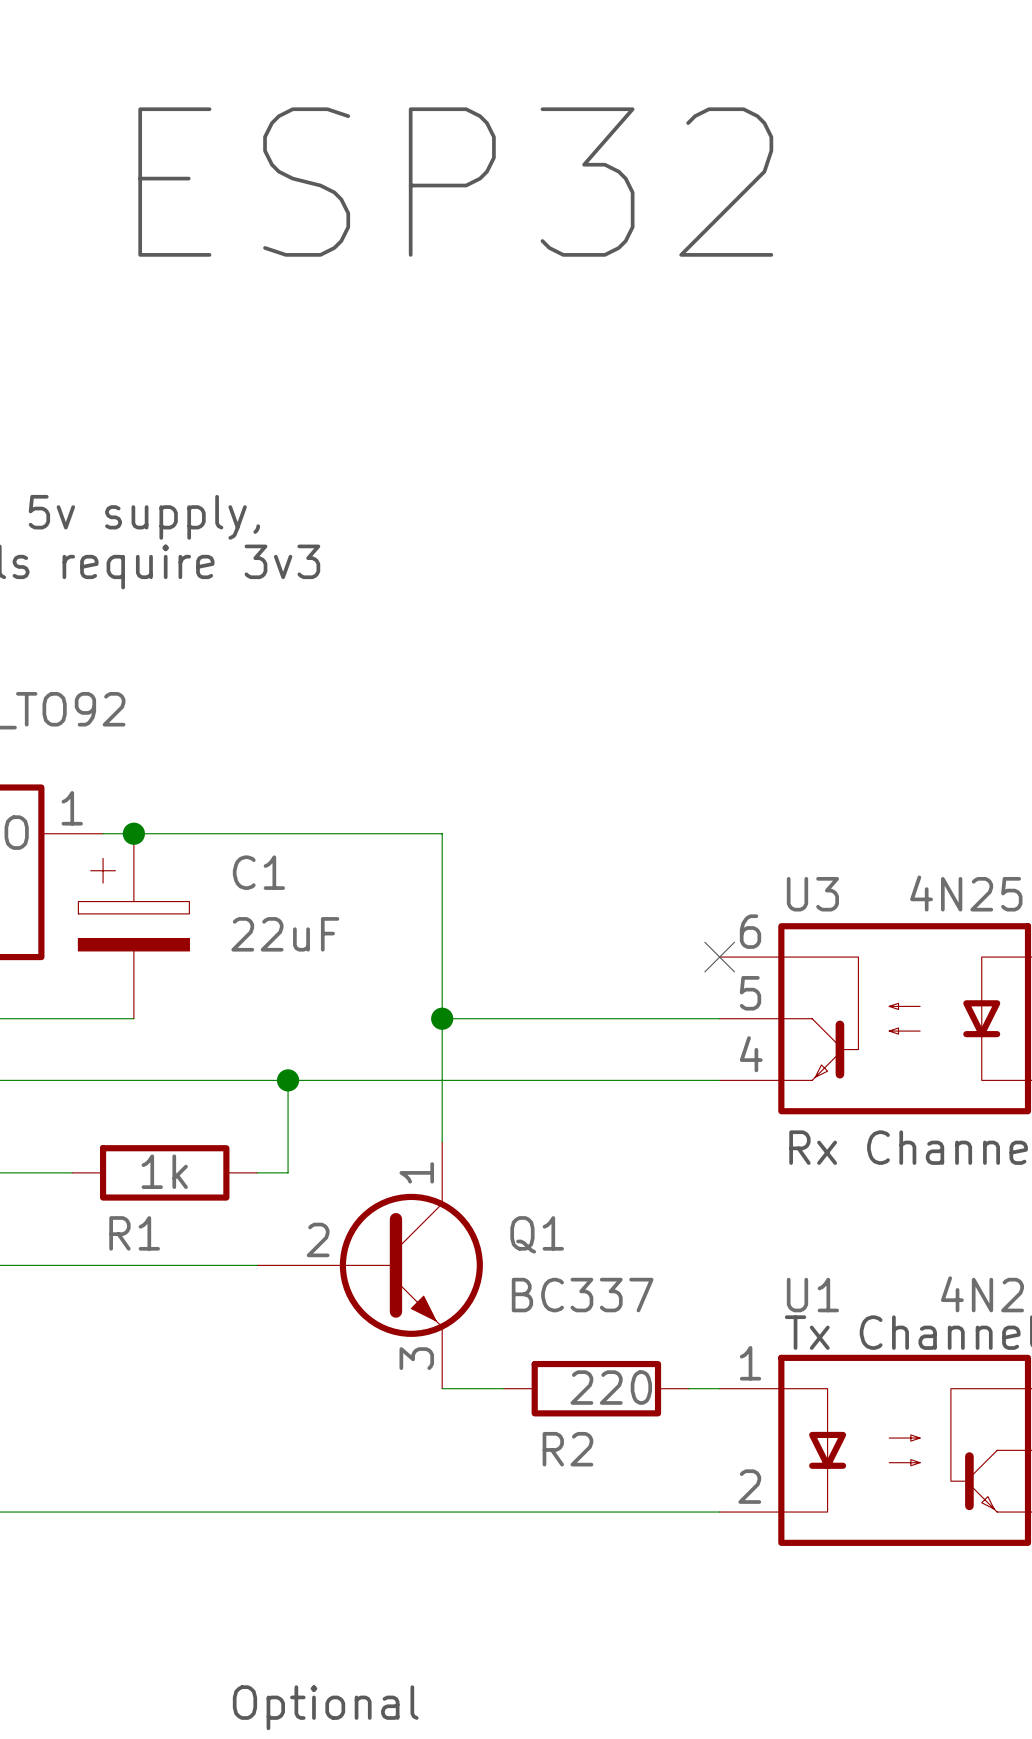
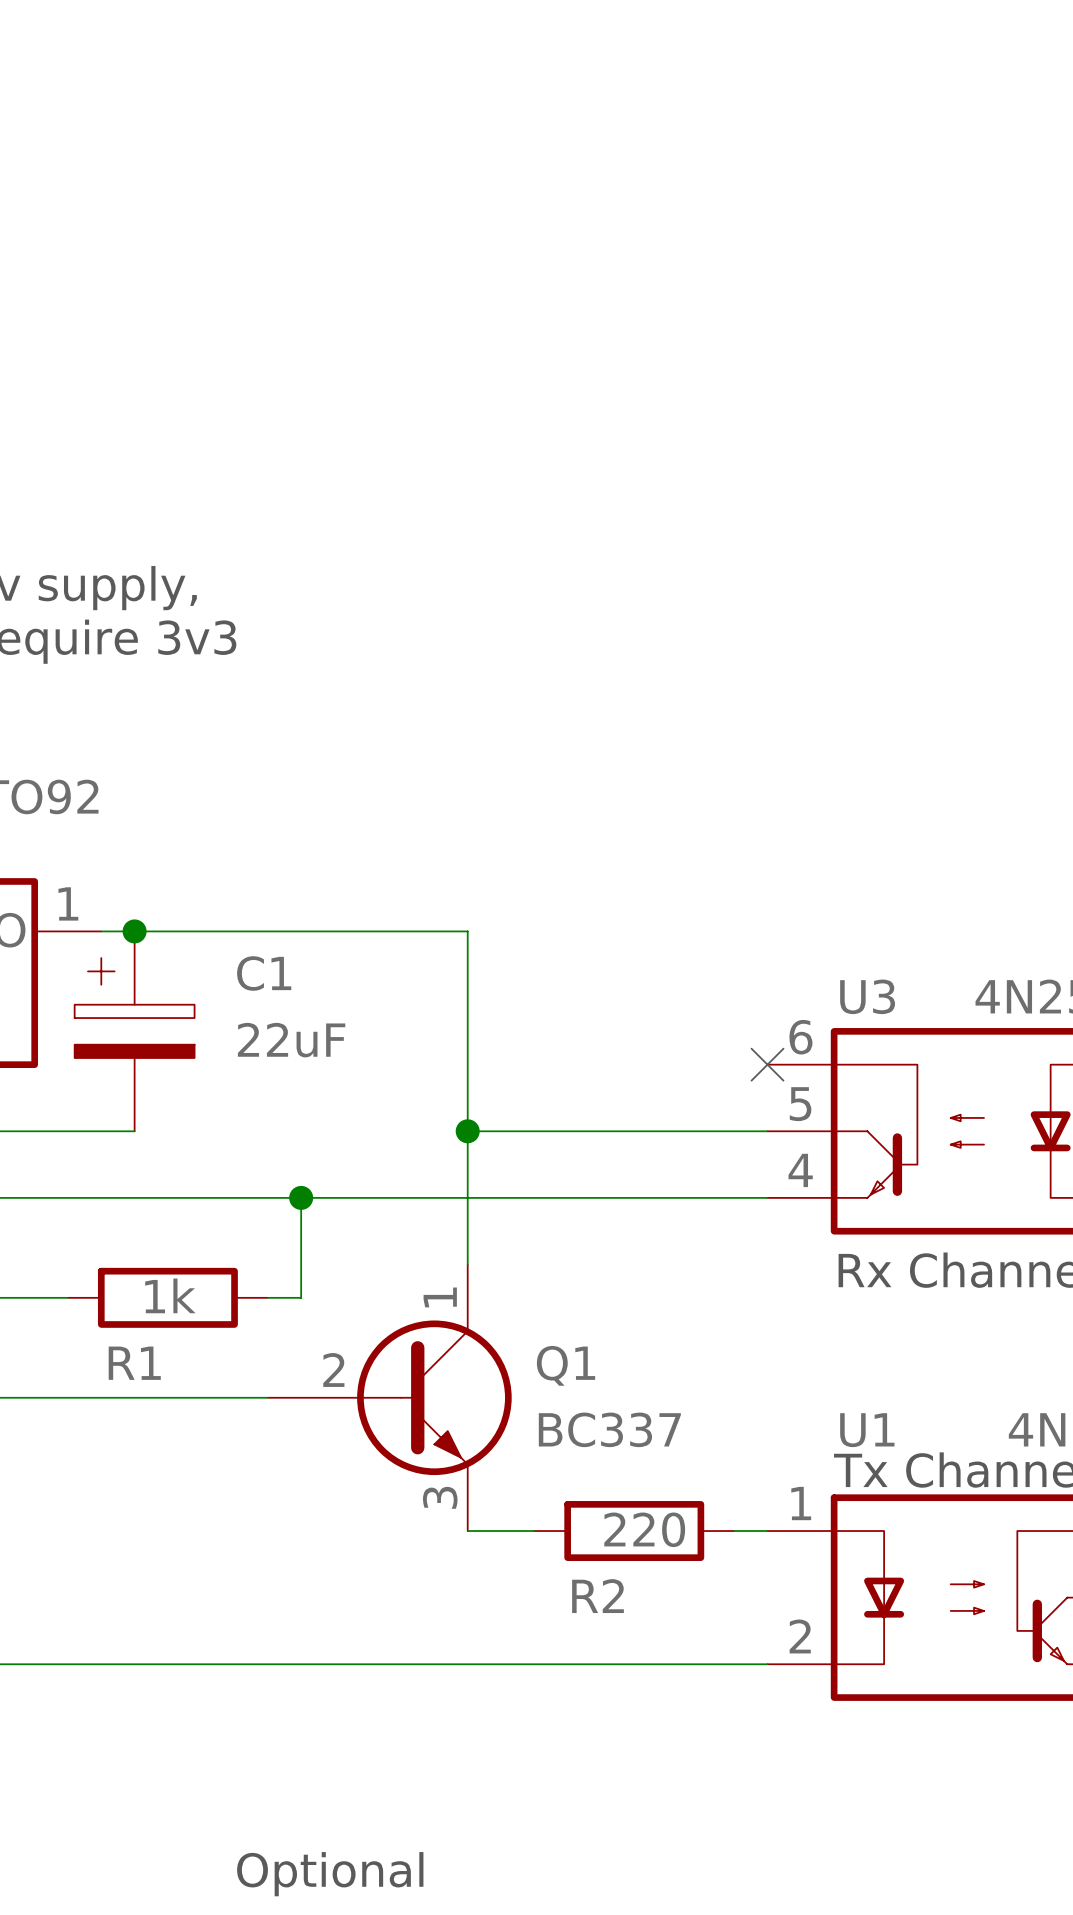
text: ESP32 (455, 182) -> none

